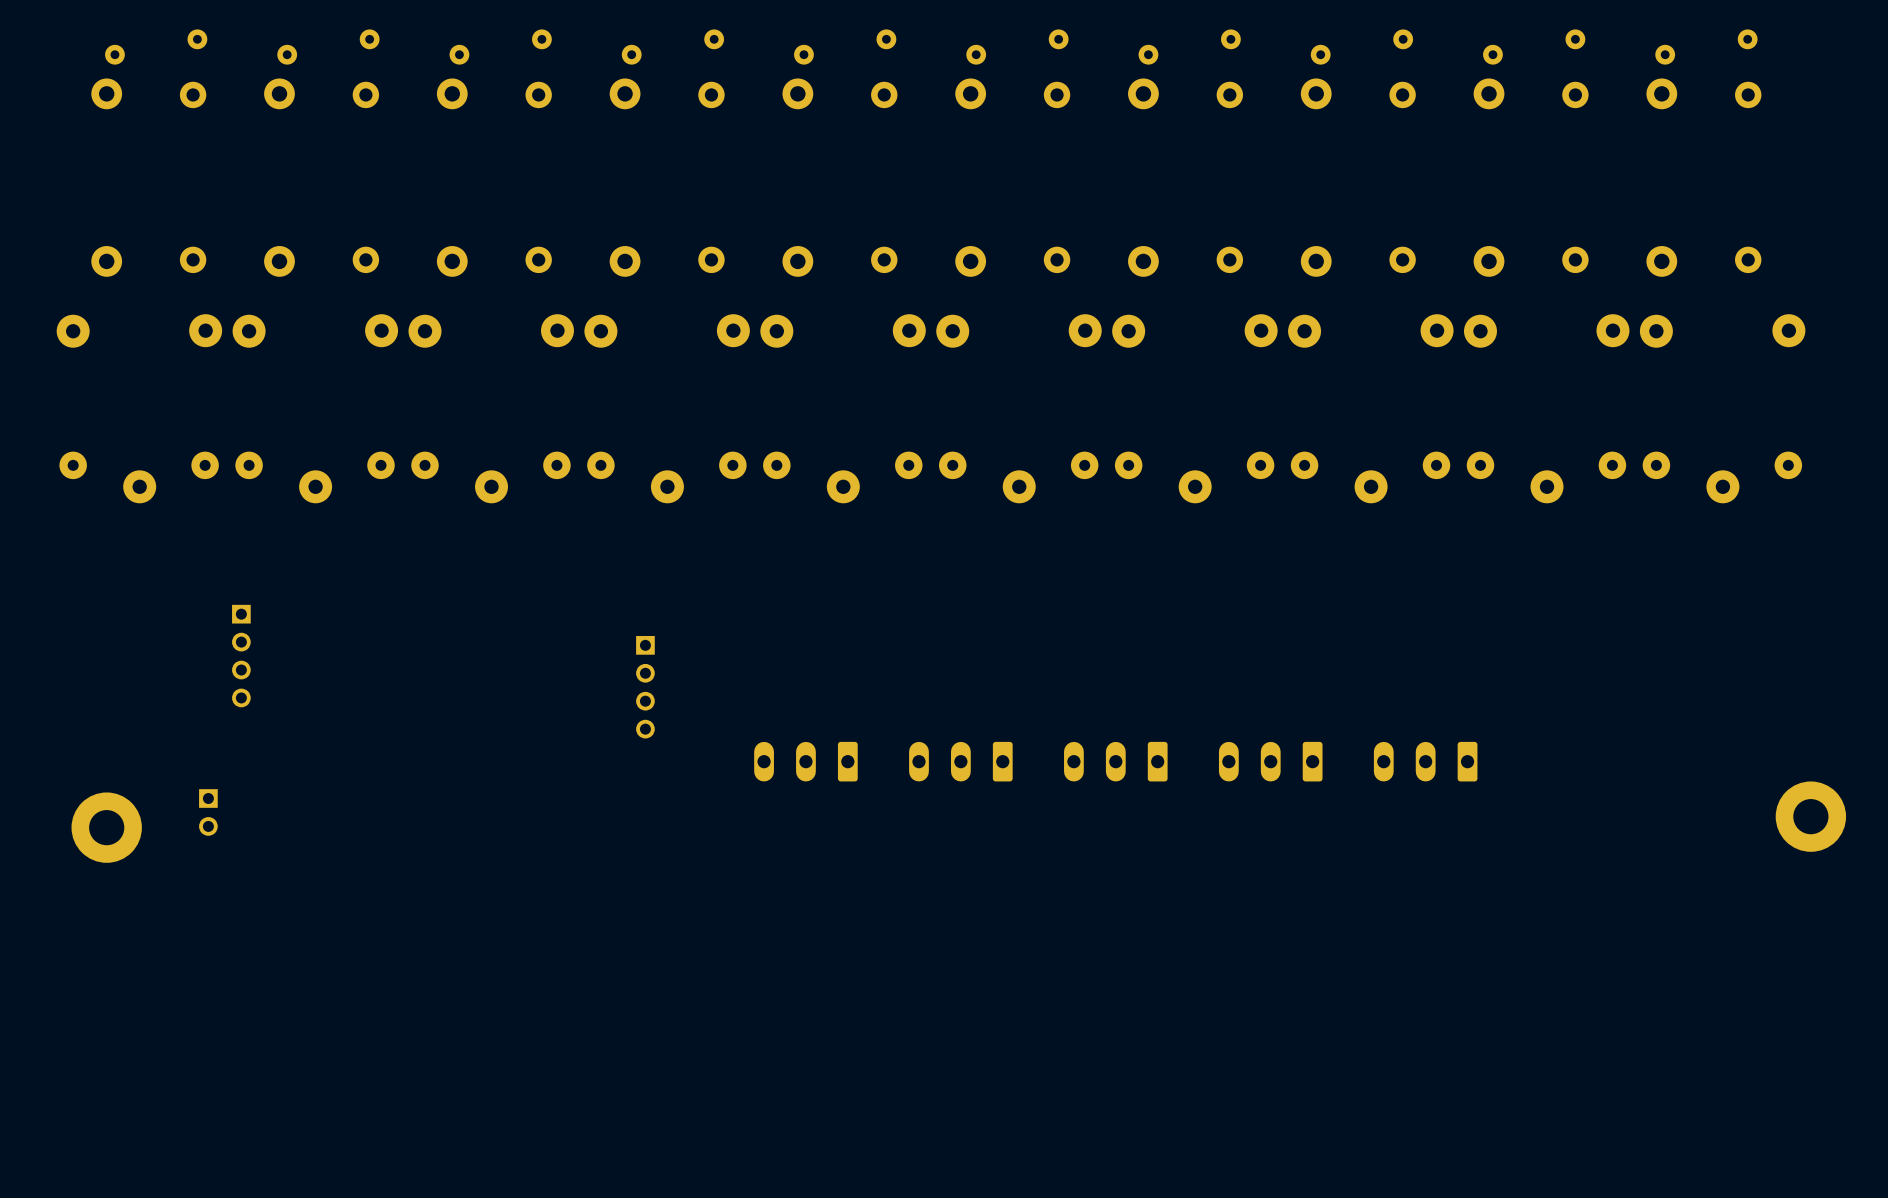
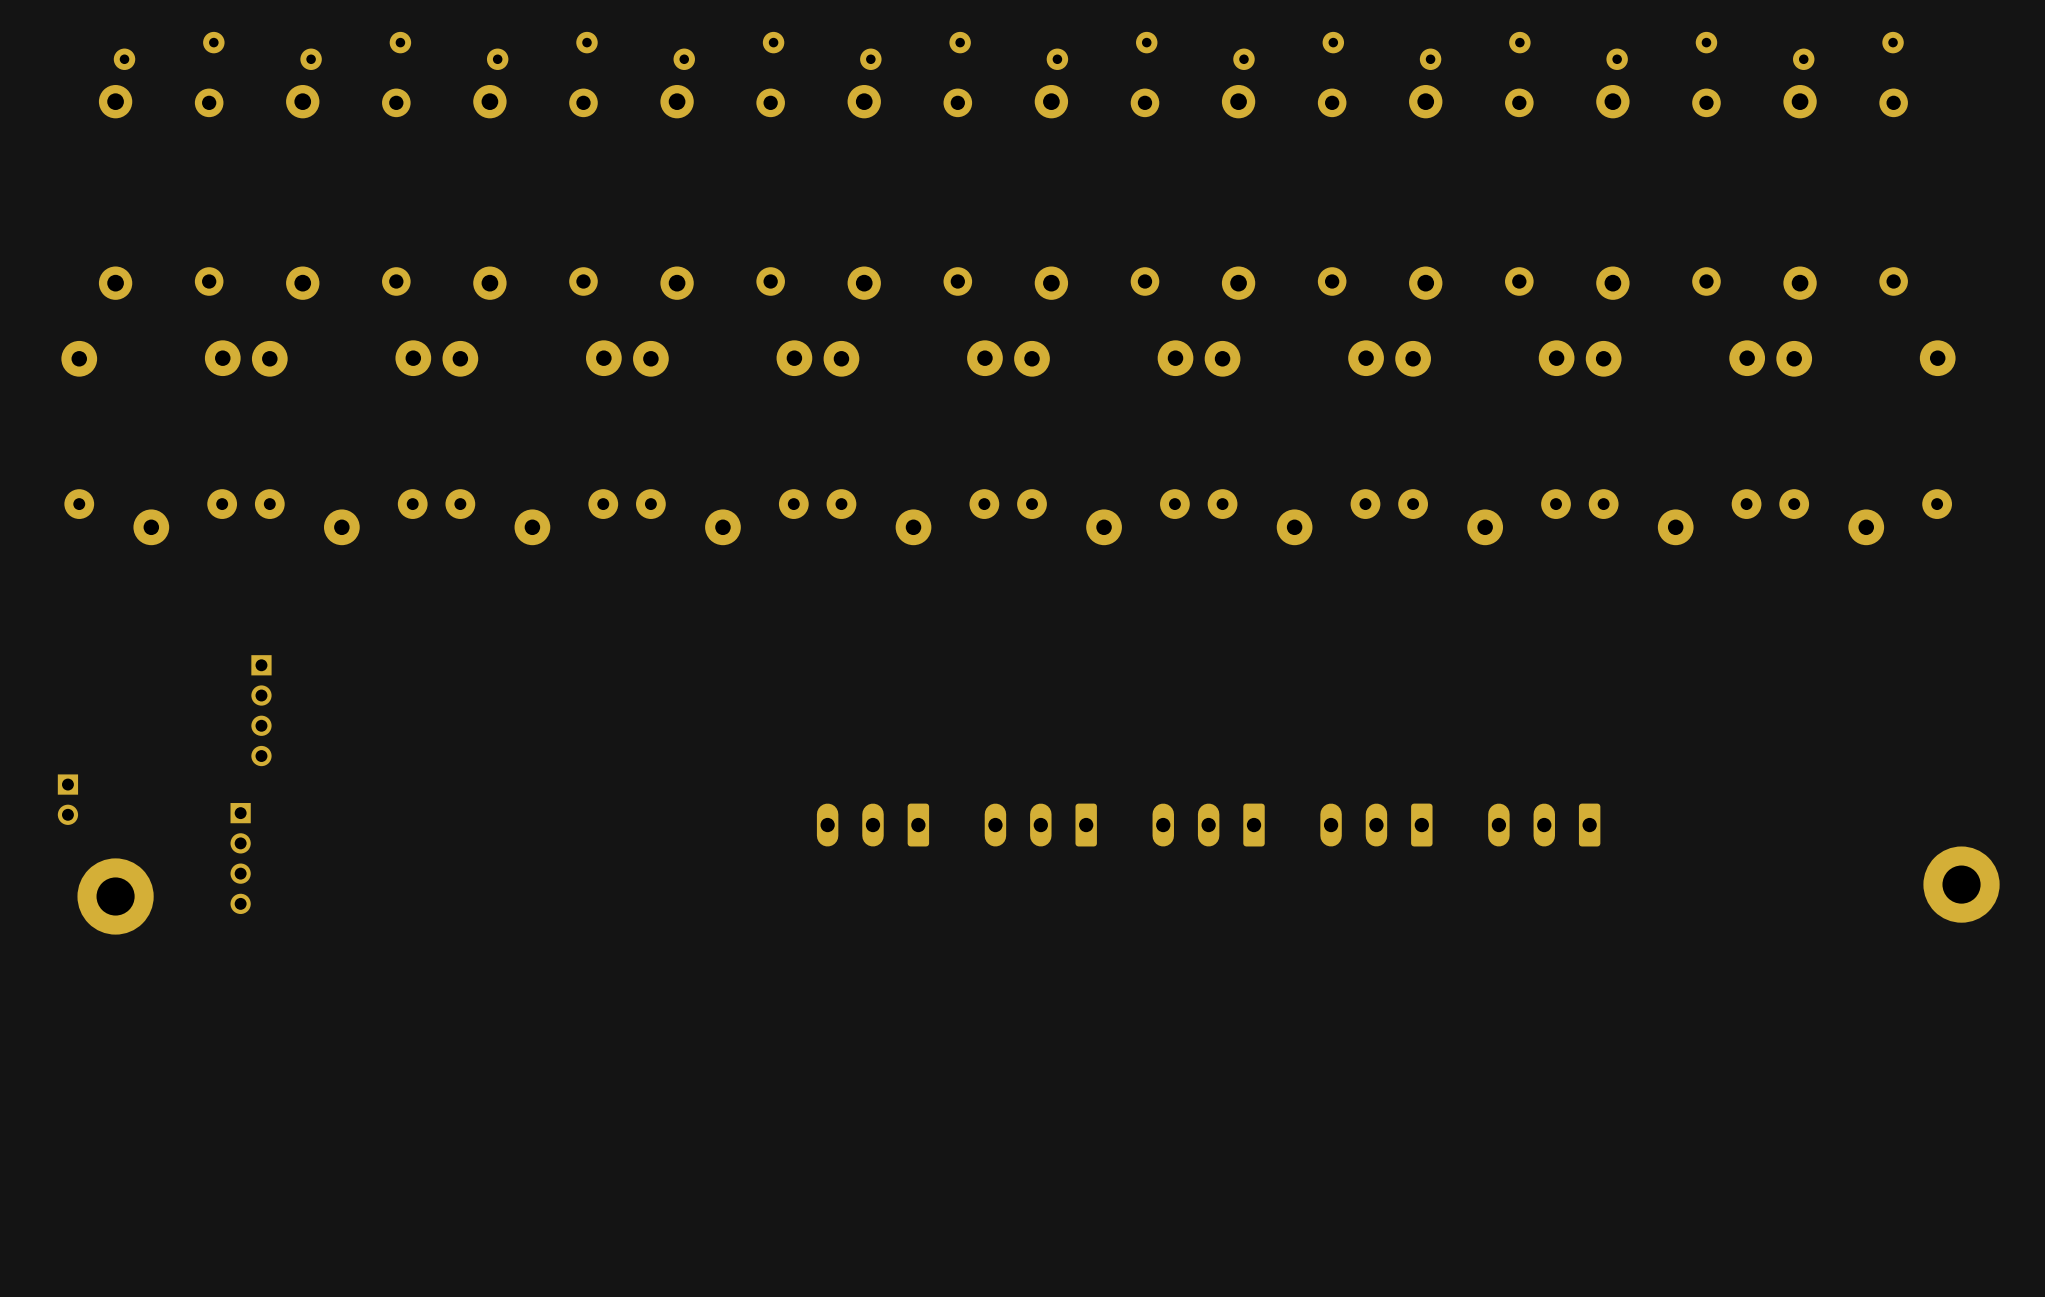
part: (645, 687) -> none
part: none -> (240, 858)
part position: (208, 812) -> (67, 799)

